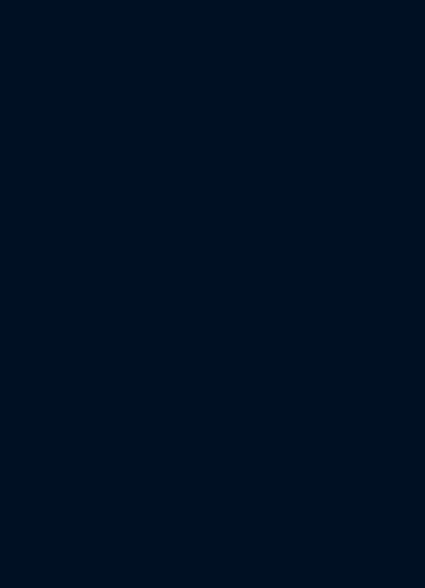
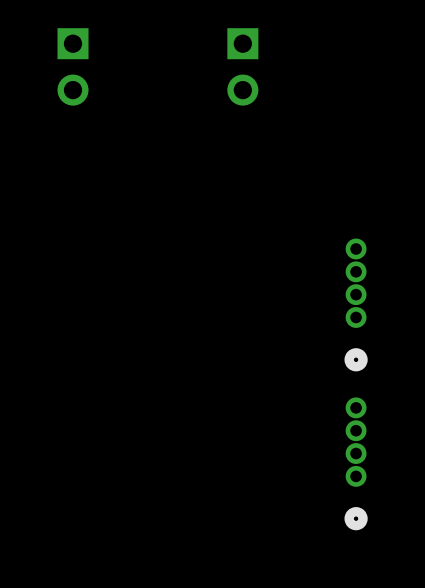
part: none -> (73, 66)
part: none -> (242, 66)
part: none -> (356, 304)
part: none -> (356, 463)

